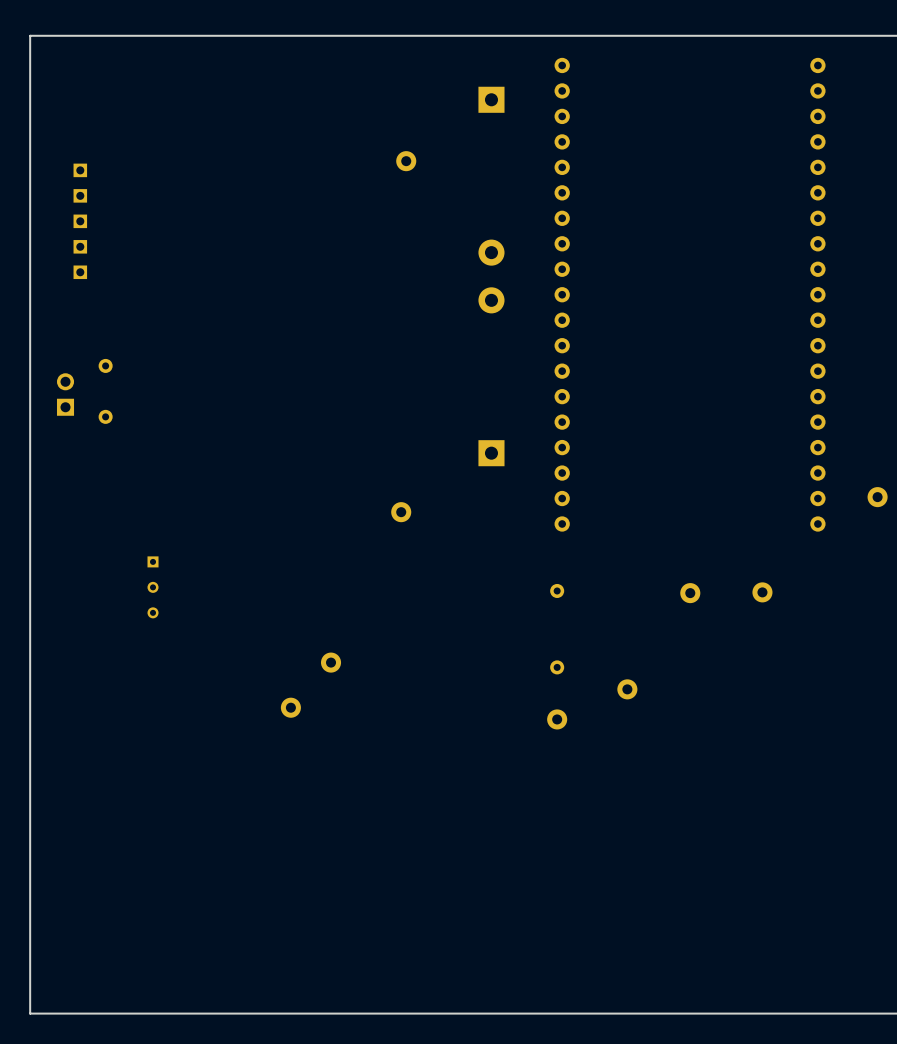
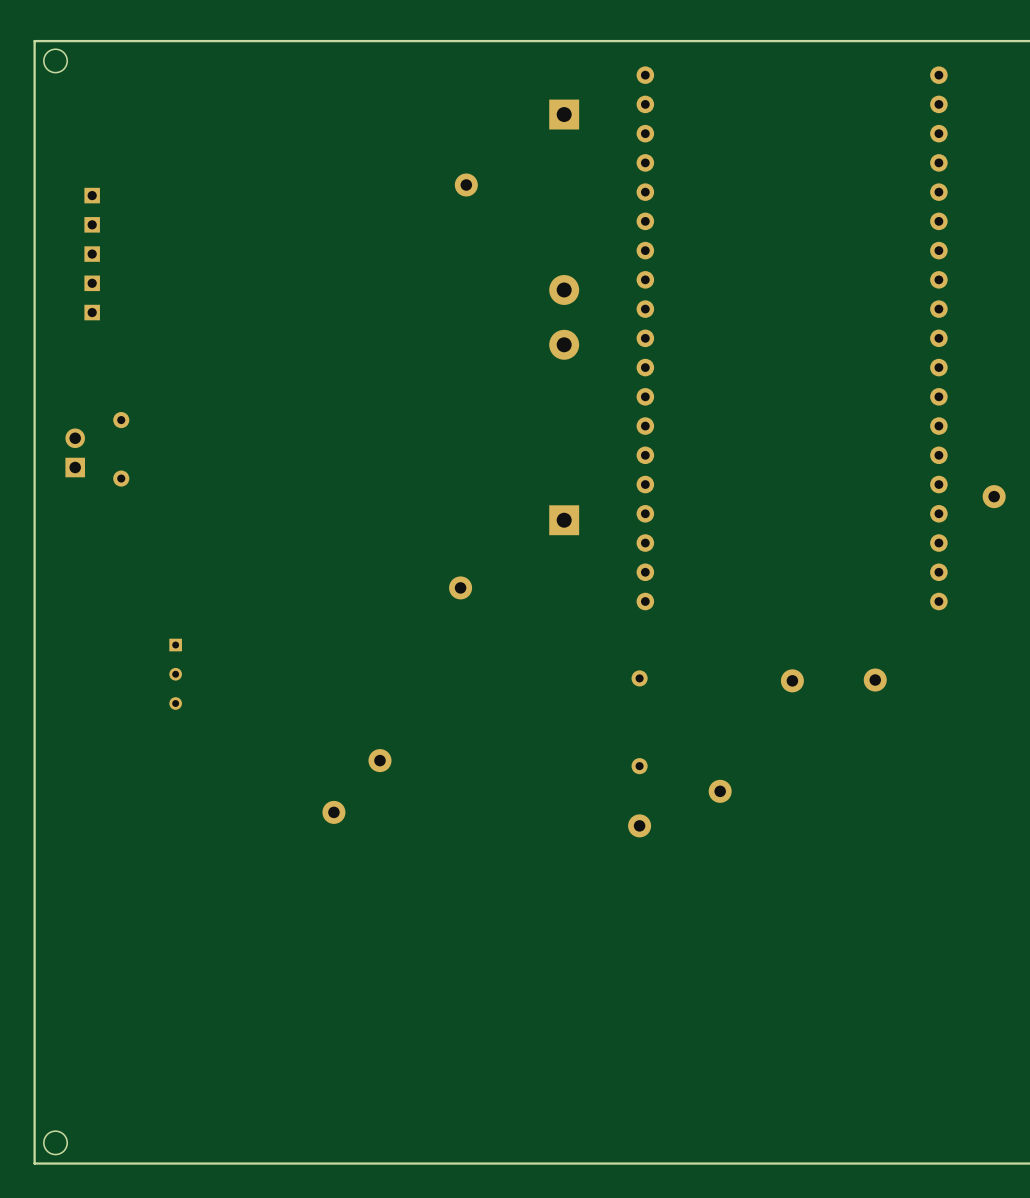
round board edge: none -> [43, 48, 68, 73]
part position: (877, 497) -> (994, 496)
round board edge: none -> [43, 1130, 68, 1155]

